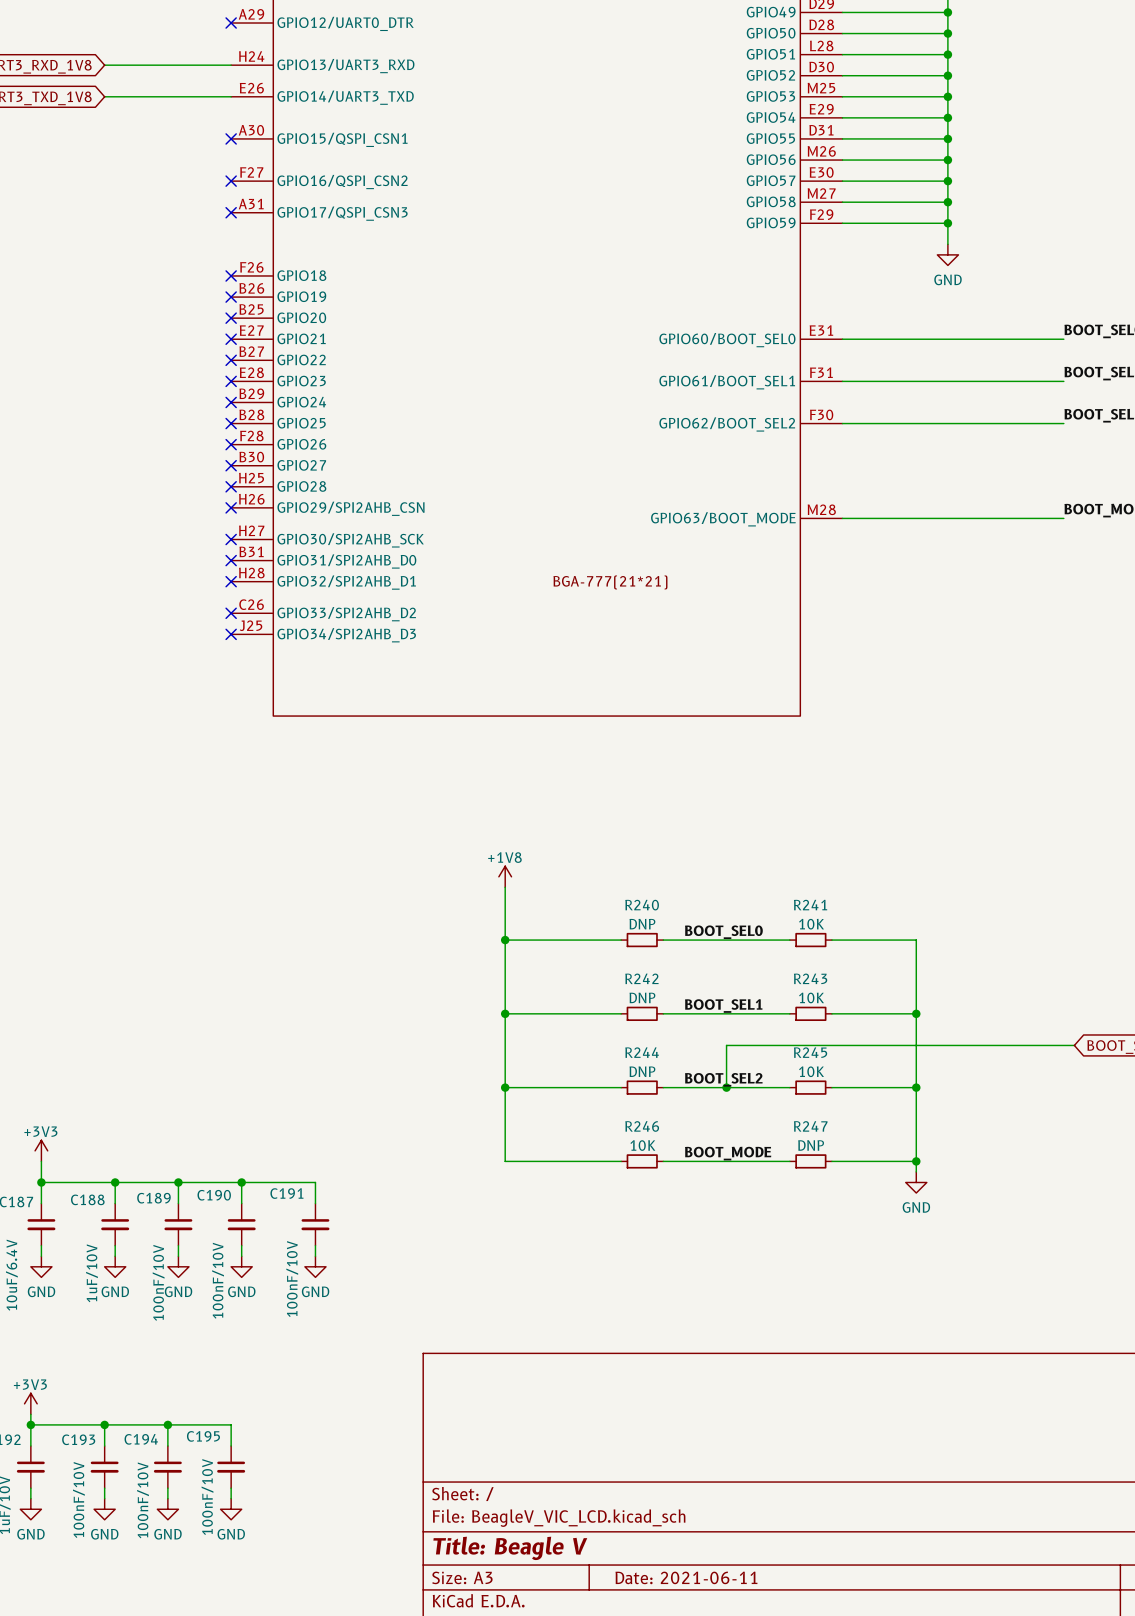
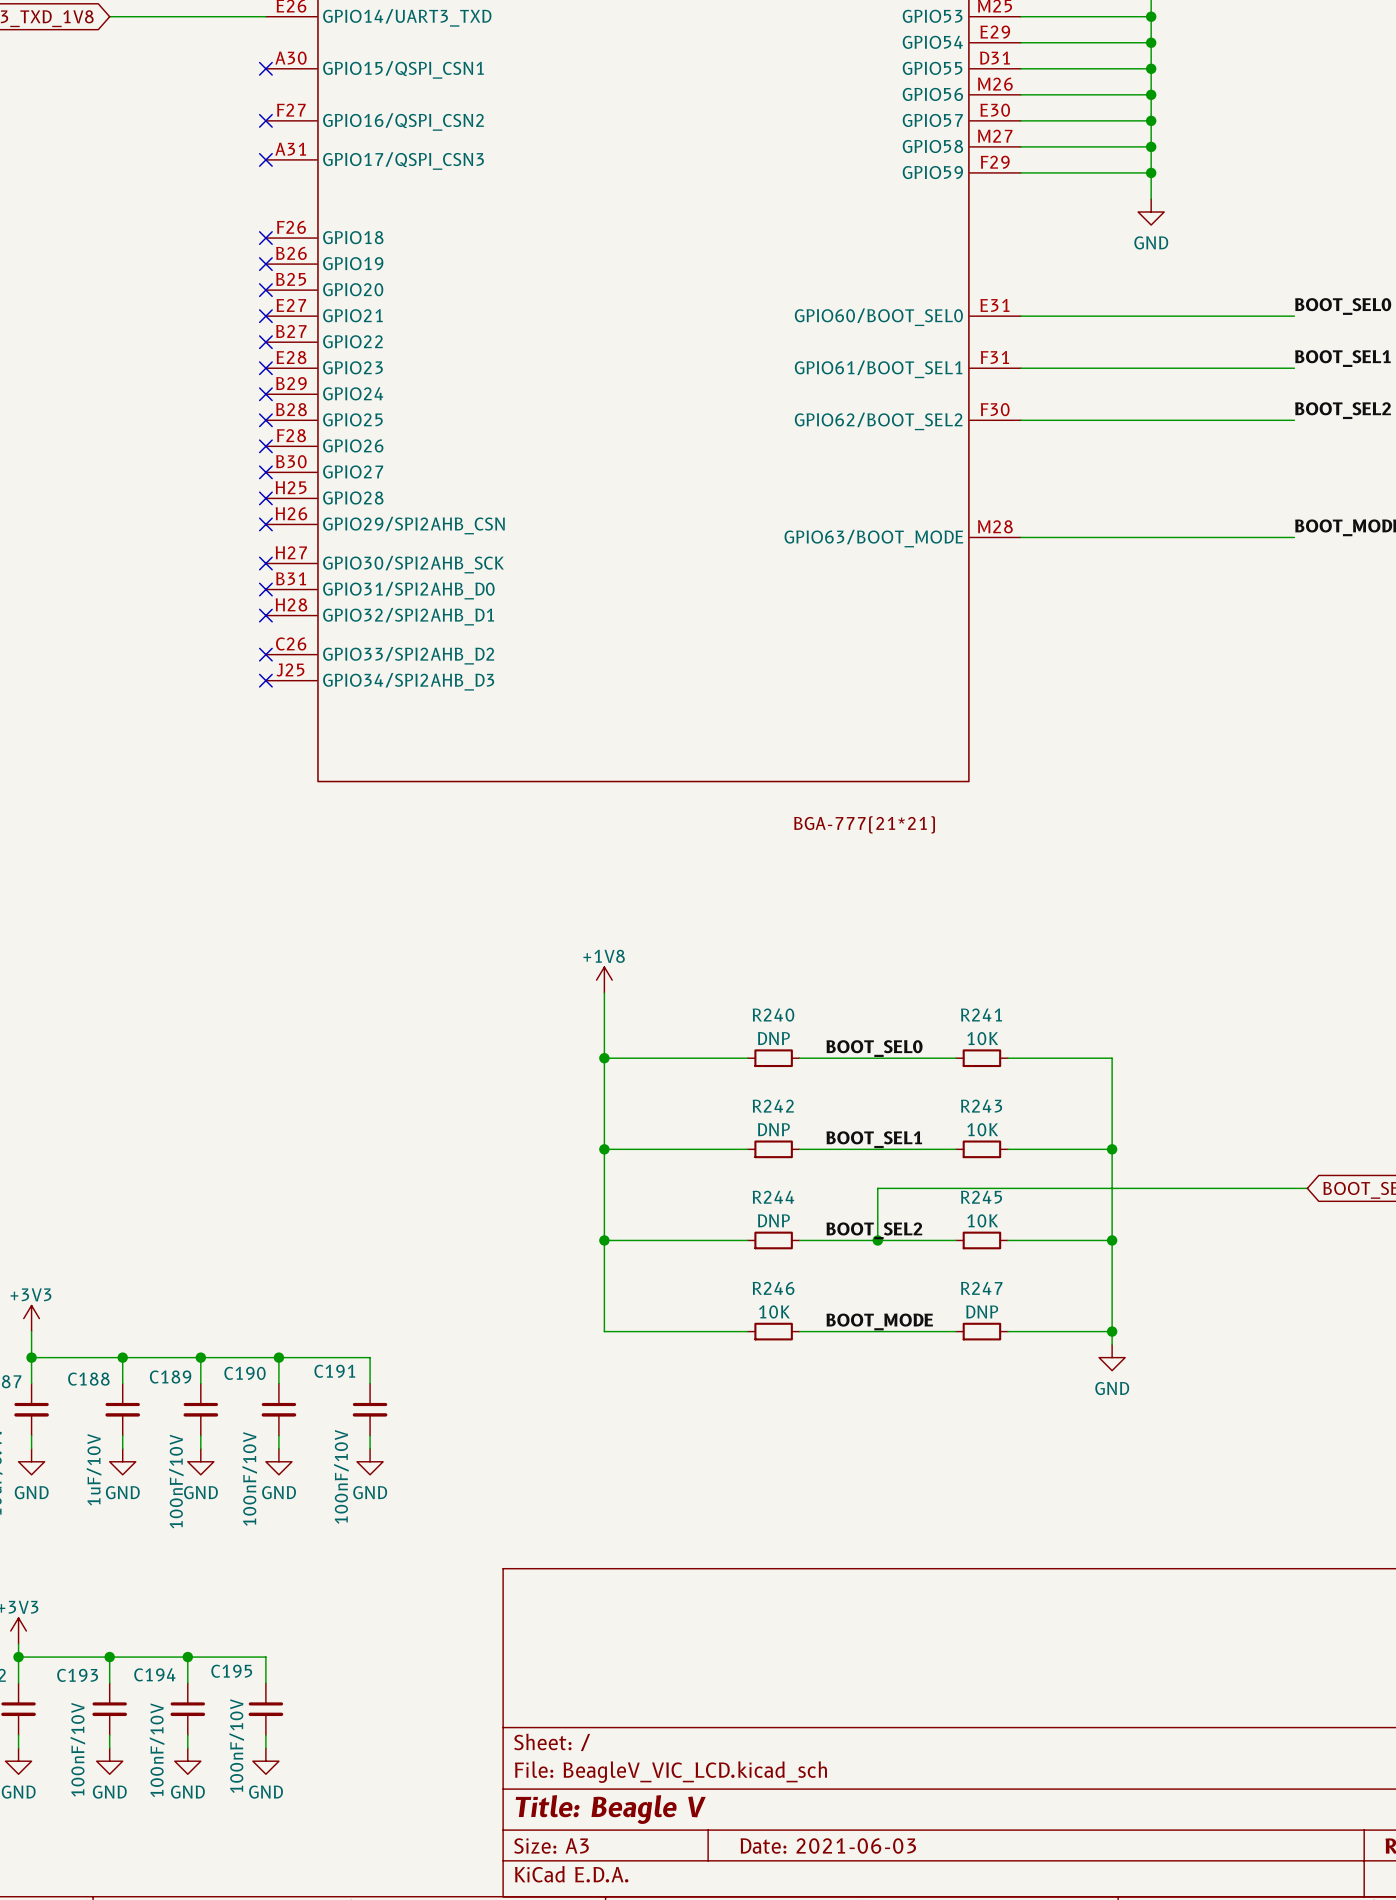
part text position: BGA-777(21*21) (610, 582) -> BGA-777(21*21) (864, 824)
title block: Date: 2021-06-11 (686, 1577) -> Date: 2021-06-03 (828, 1846)

